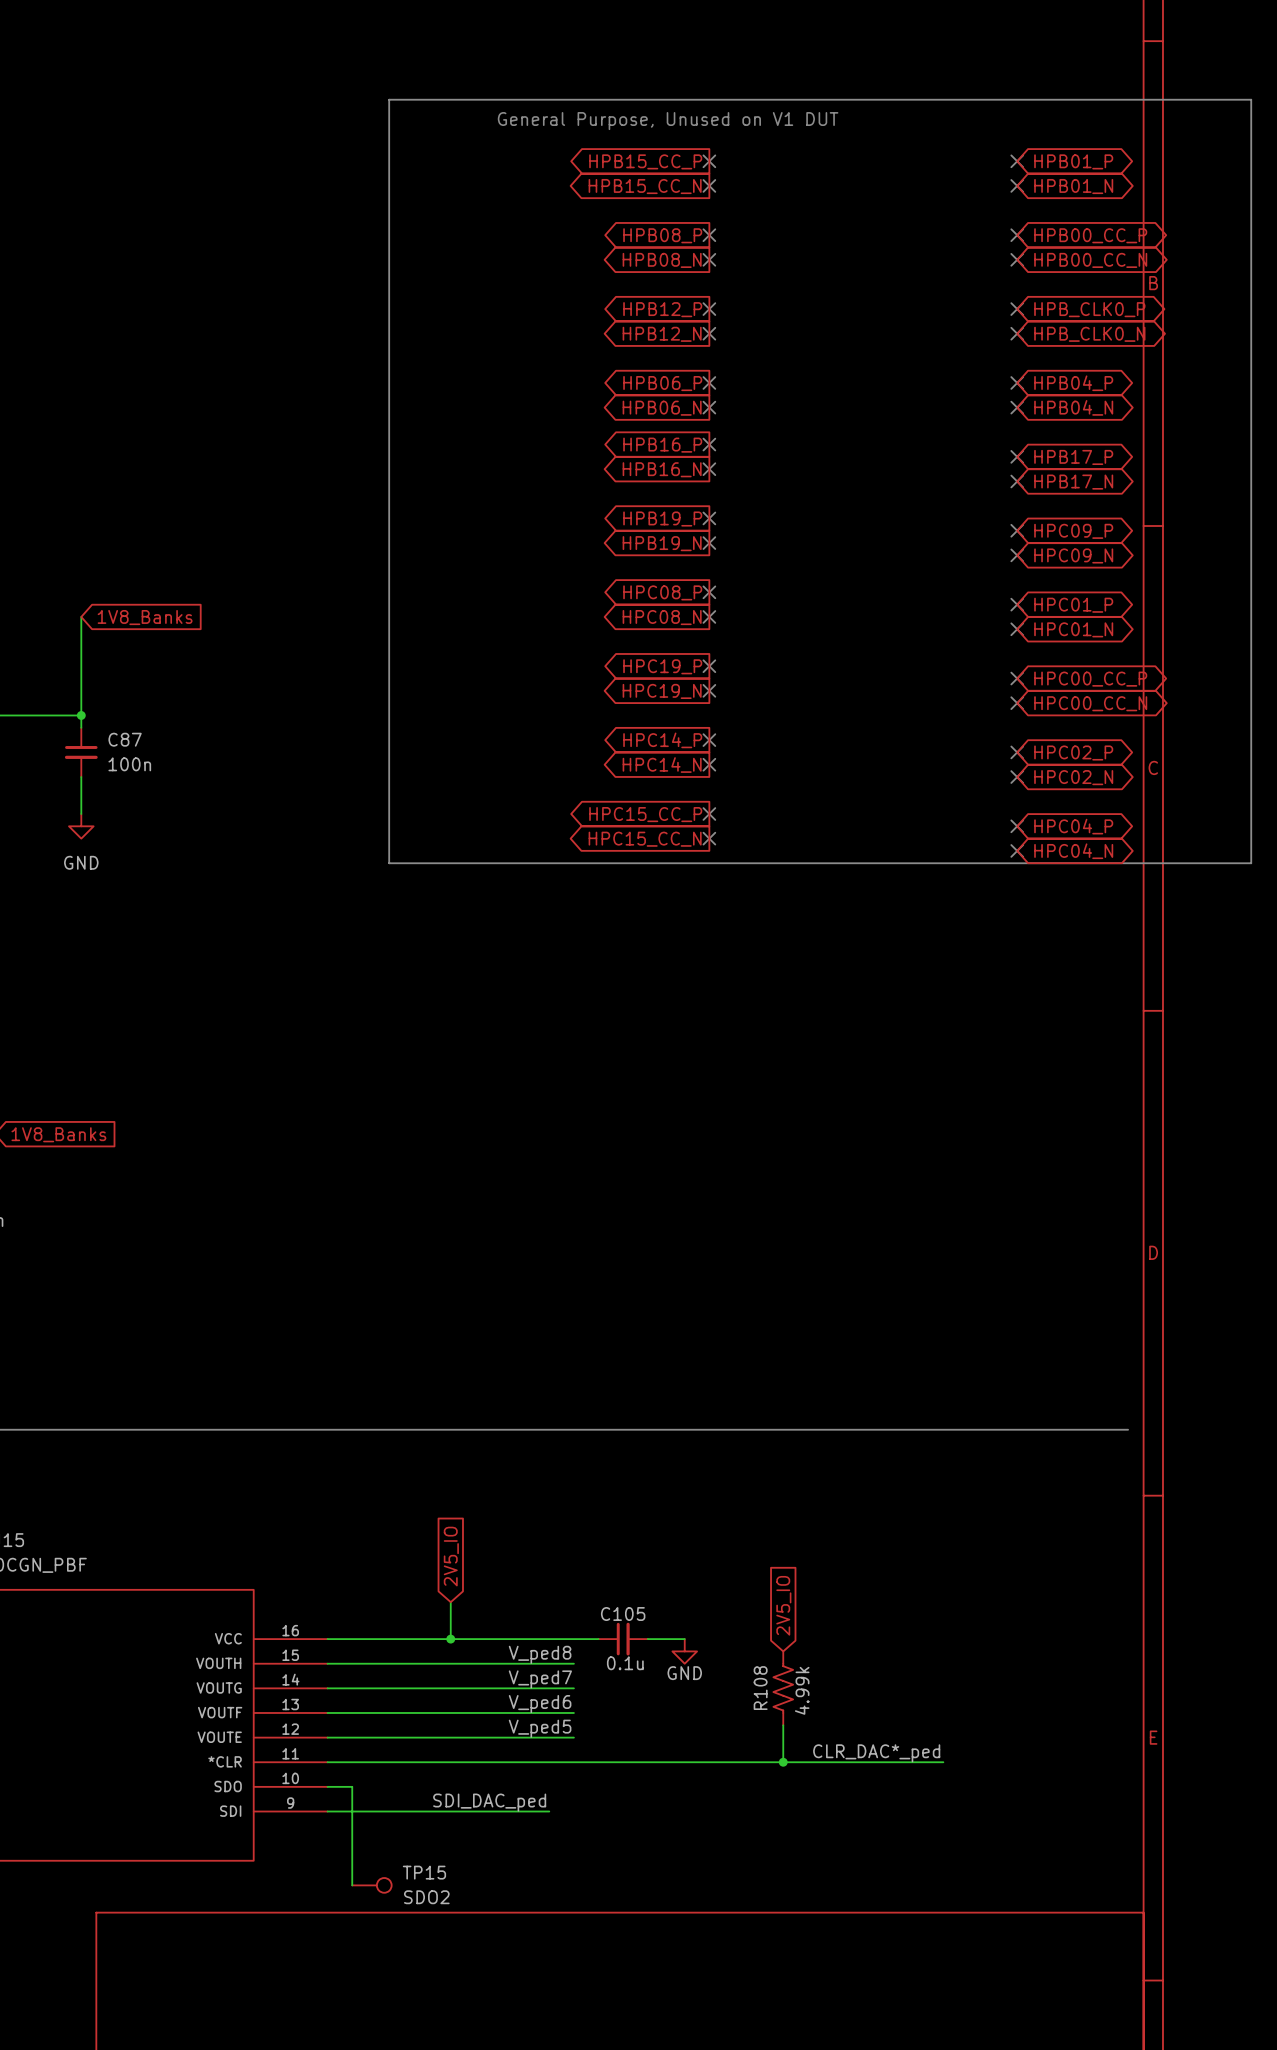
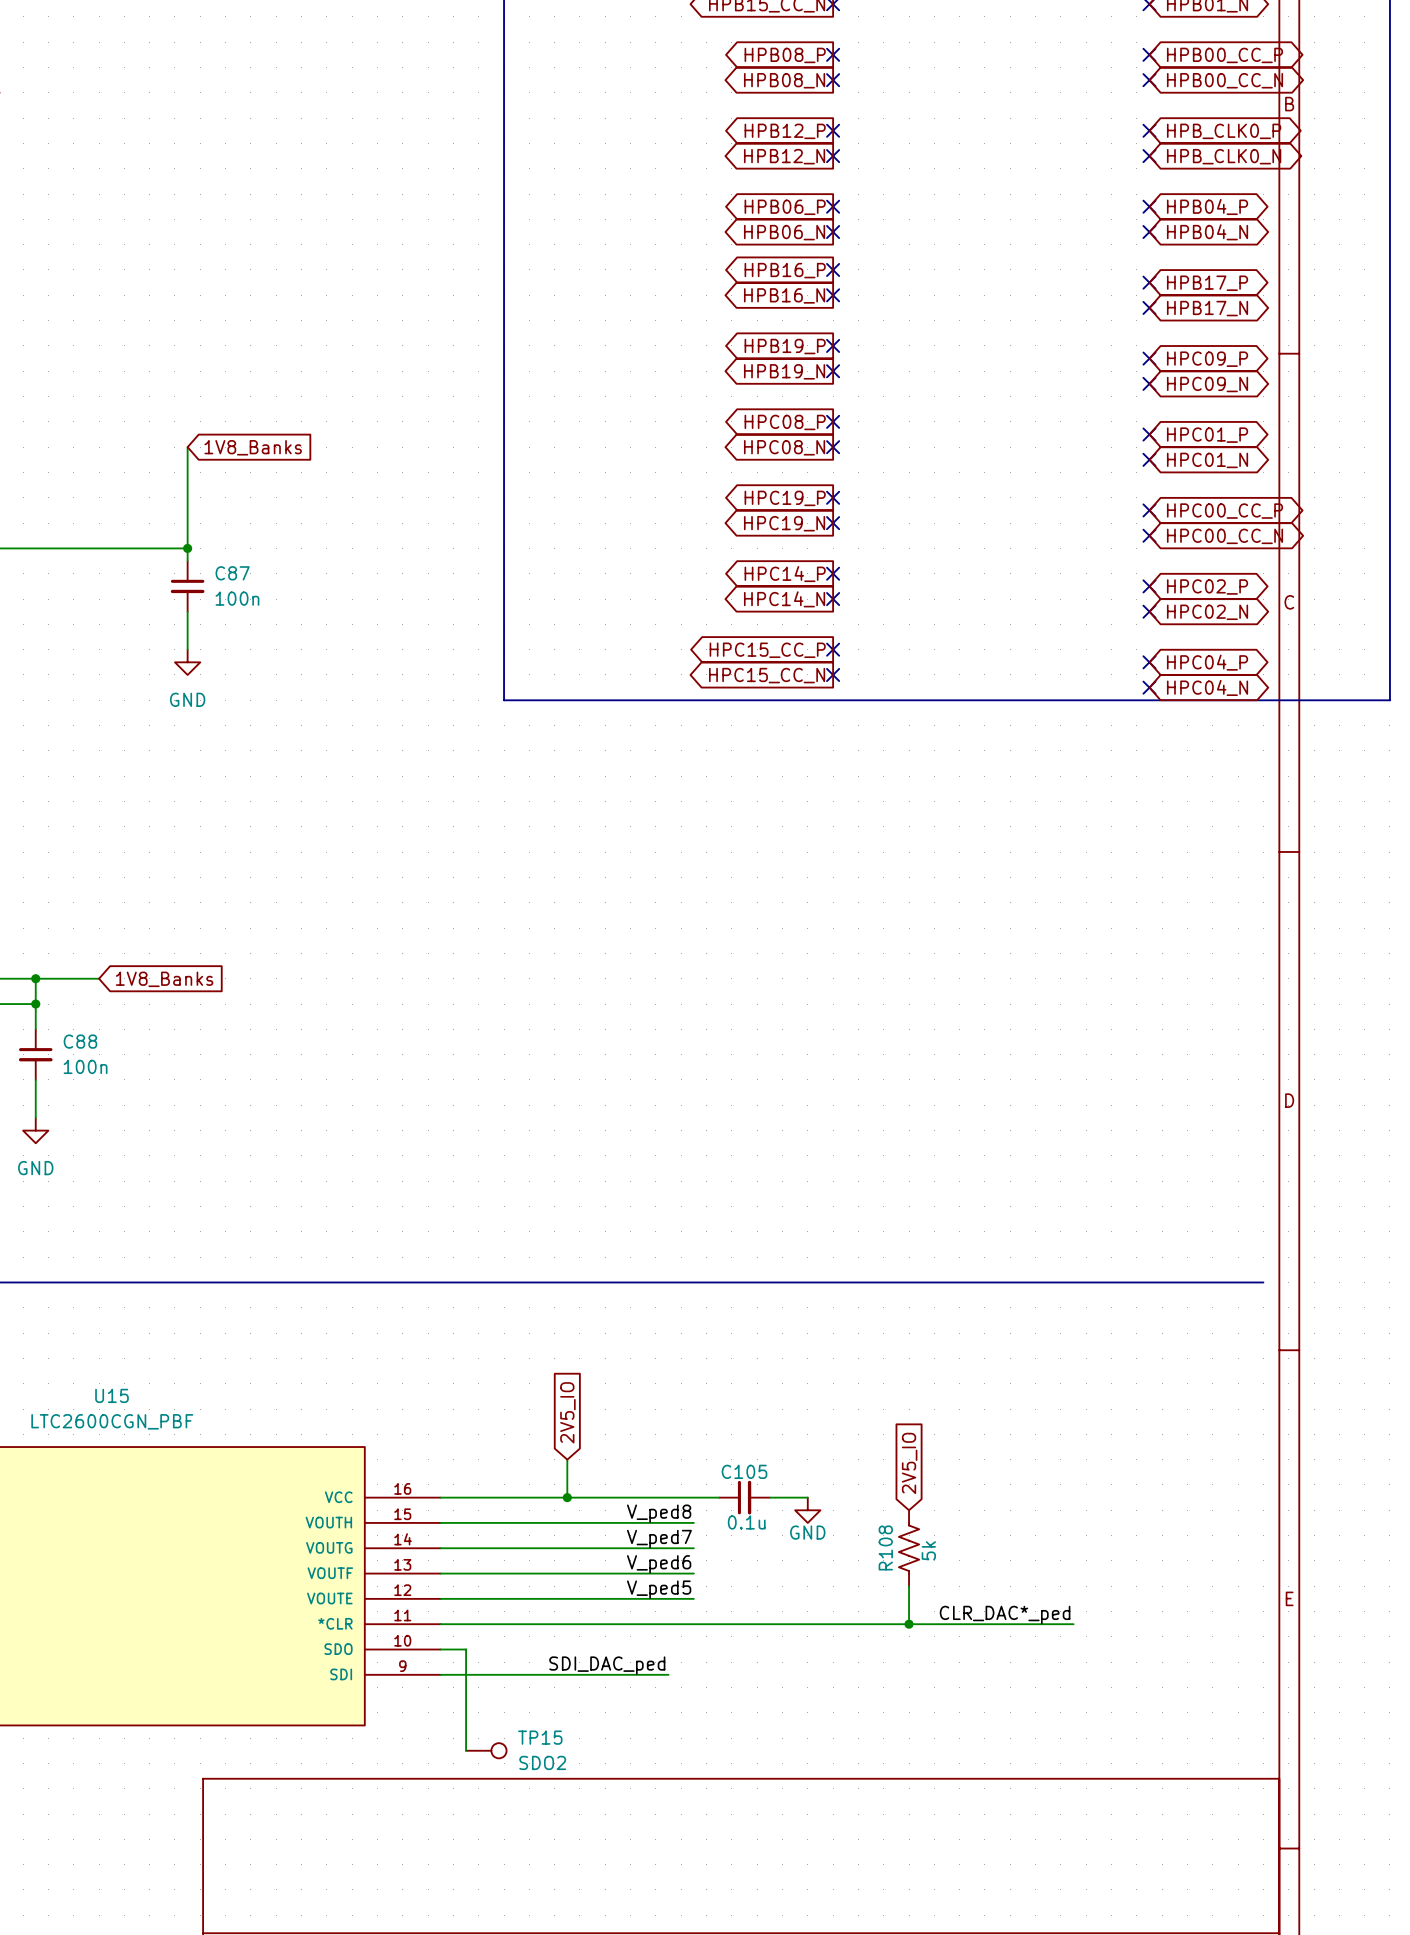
R108 value: 4.99k (802, 1690) -> 5k (928, 1550)

